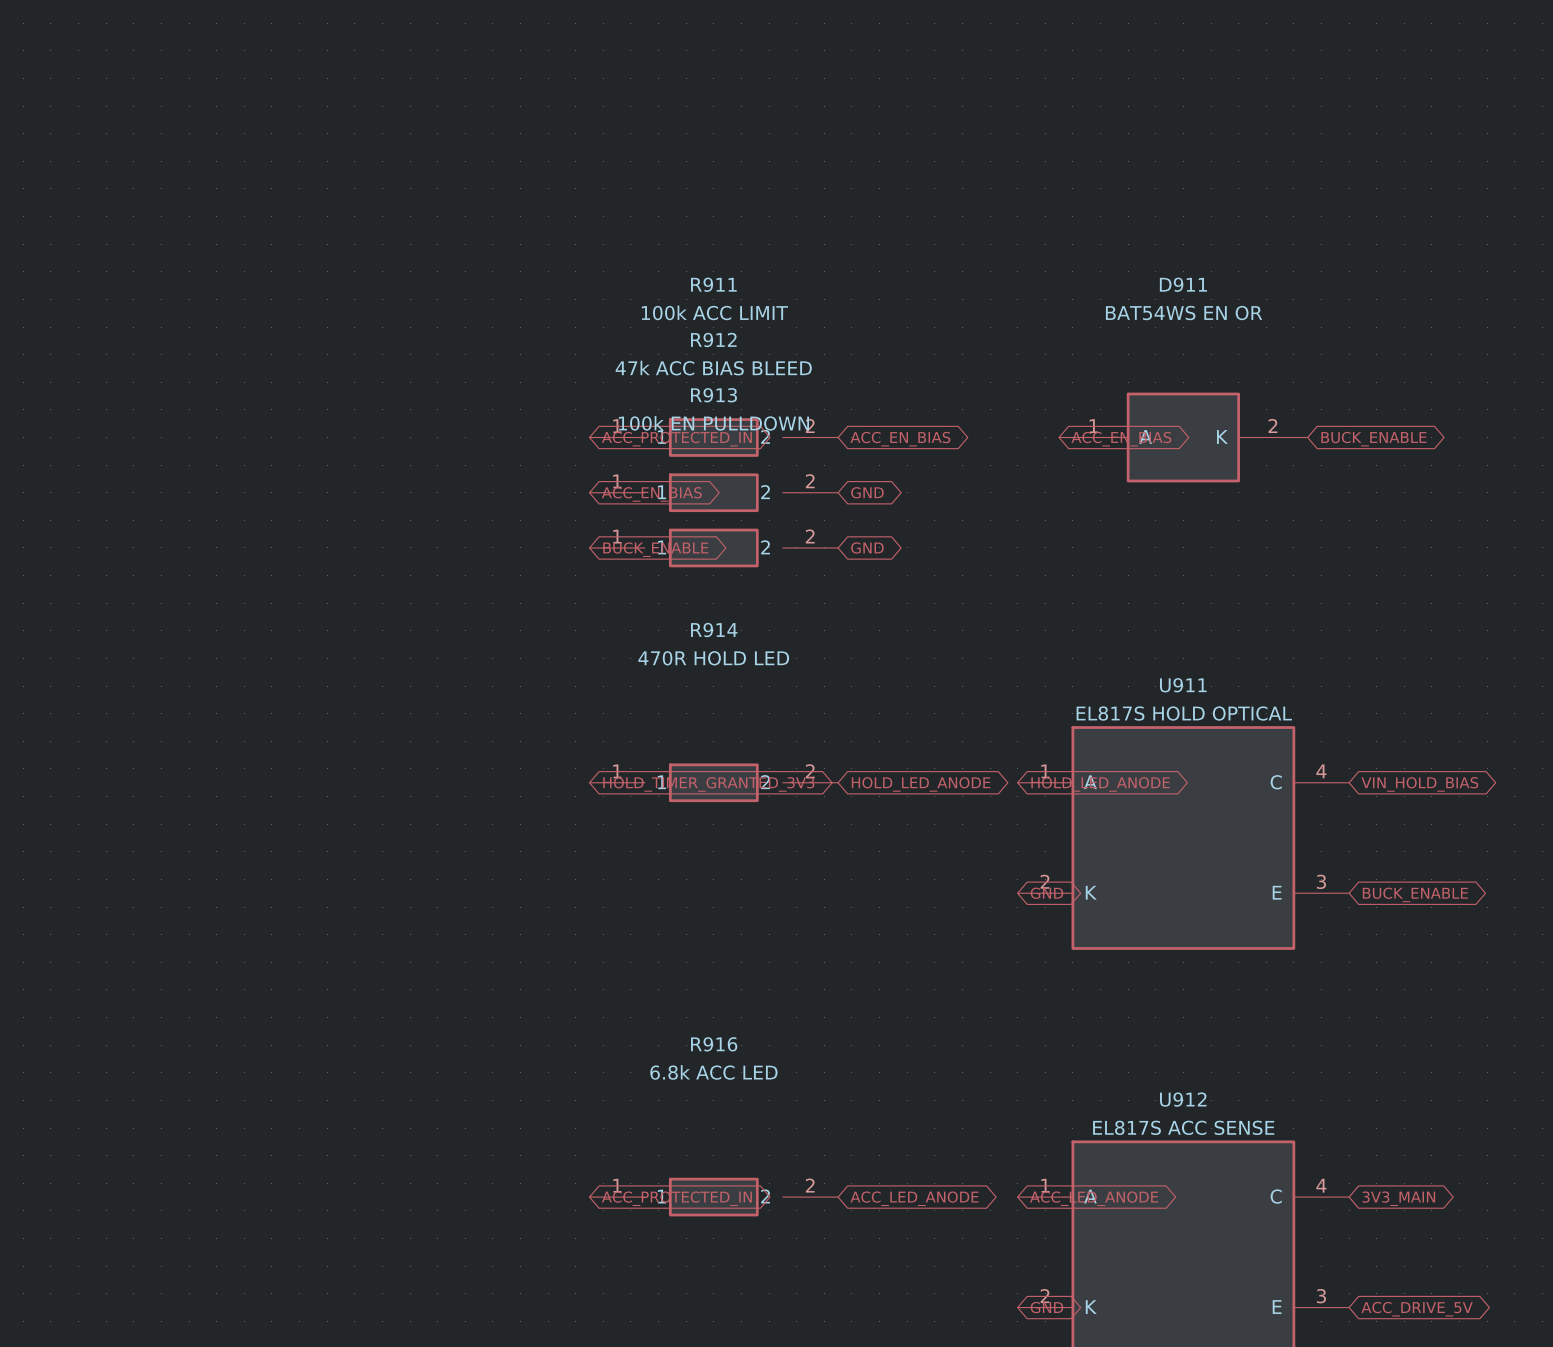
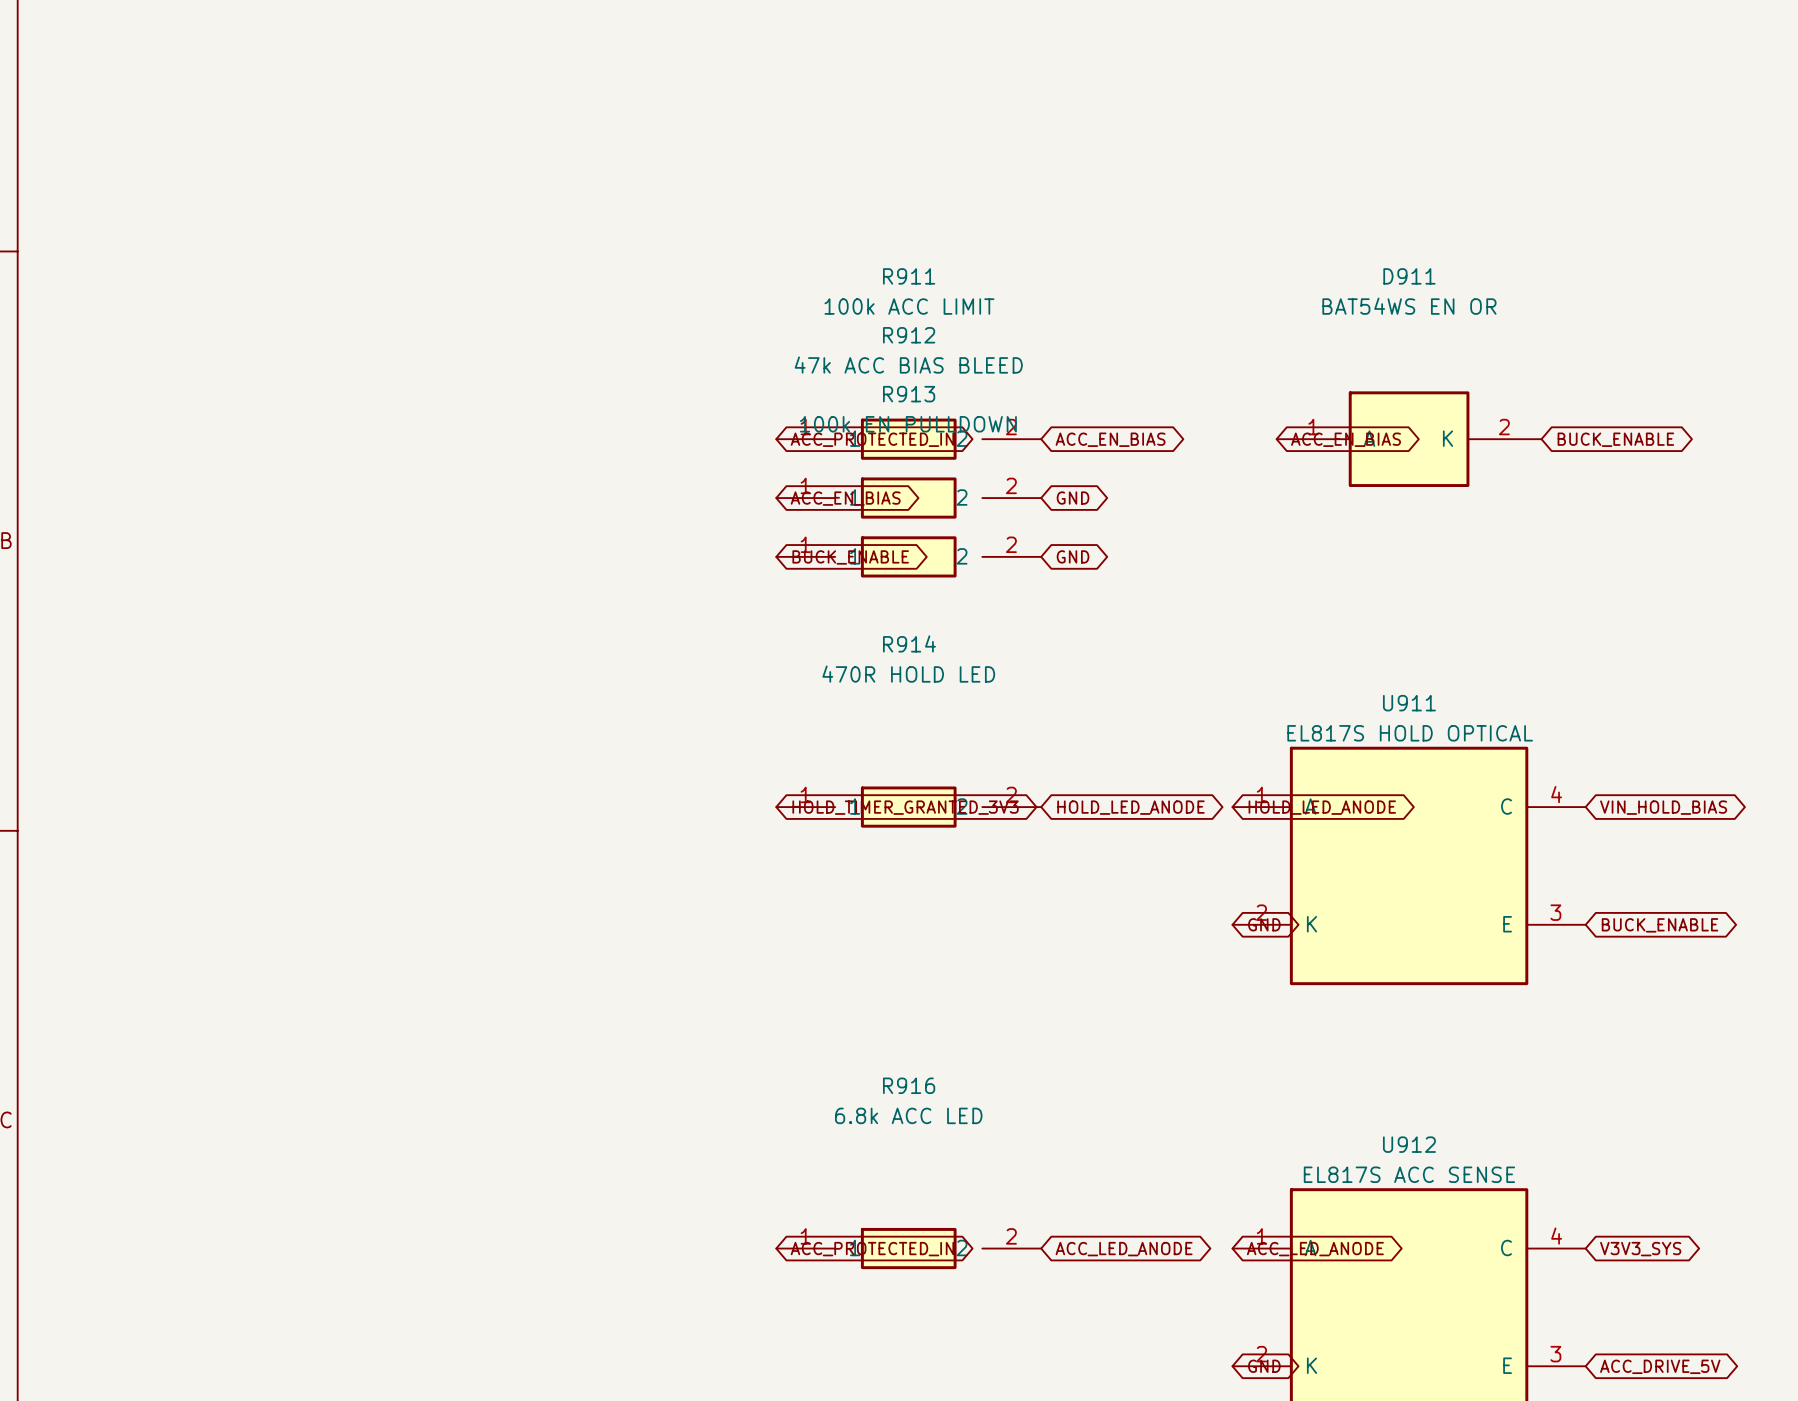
global label: 3V3_MAIN (1398, 1198) -> V3V3_SYS (1640, 1249)

